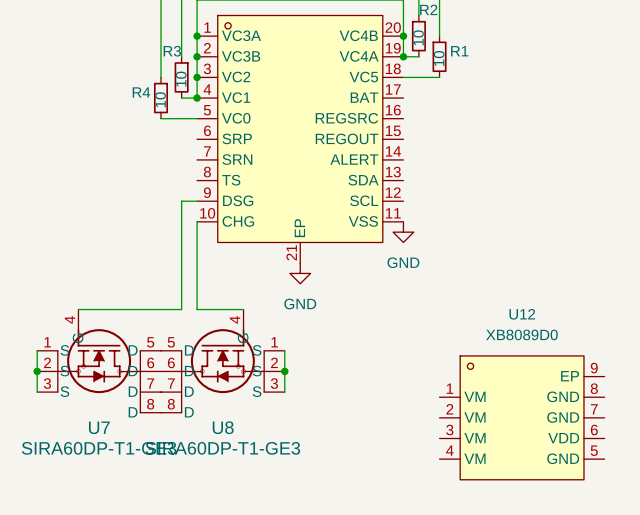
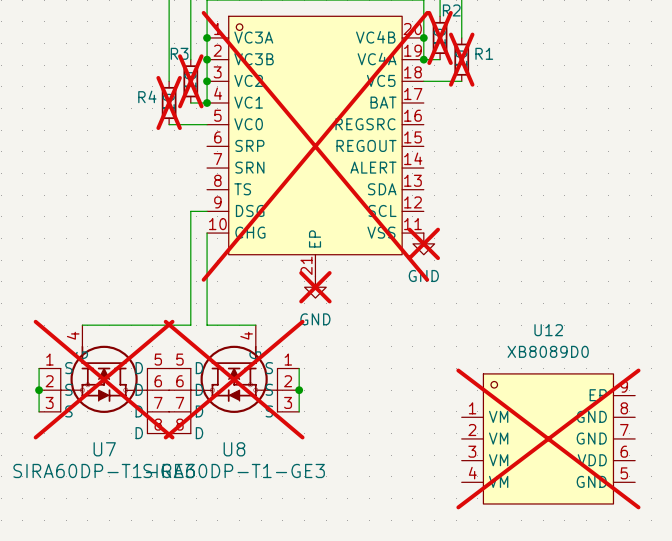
R2 do-not-place cross: none -> (440, 37)
R1 do-not-place cross: none -> (461, 59)
R3 do-not-place cross: none -> (190, 81)
R4 do-not-place cross: none -> (169, 102)
part do-not-place cross: none -> (315, 146)
power symbol do-not-place cross: none -> (423, 243)
power symbol do-not-place cross: none -> (315, 287)
U7 do-not-place cross: none -> (104, 379)
U8 do-not-place cross: none -> (234, 379)
U12 do-not-place cross: none -> (548, 438)

